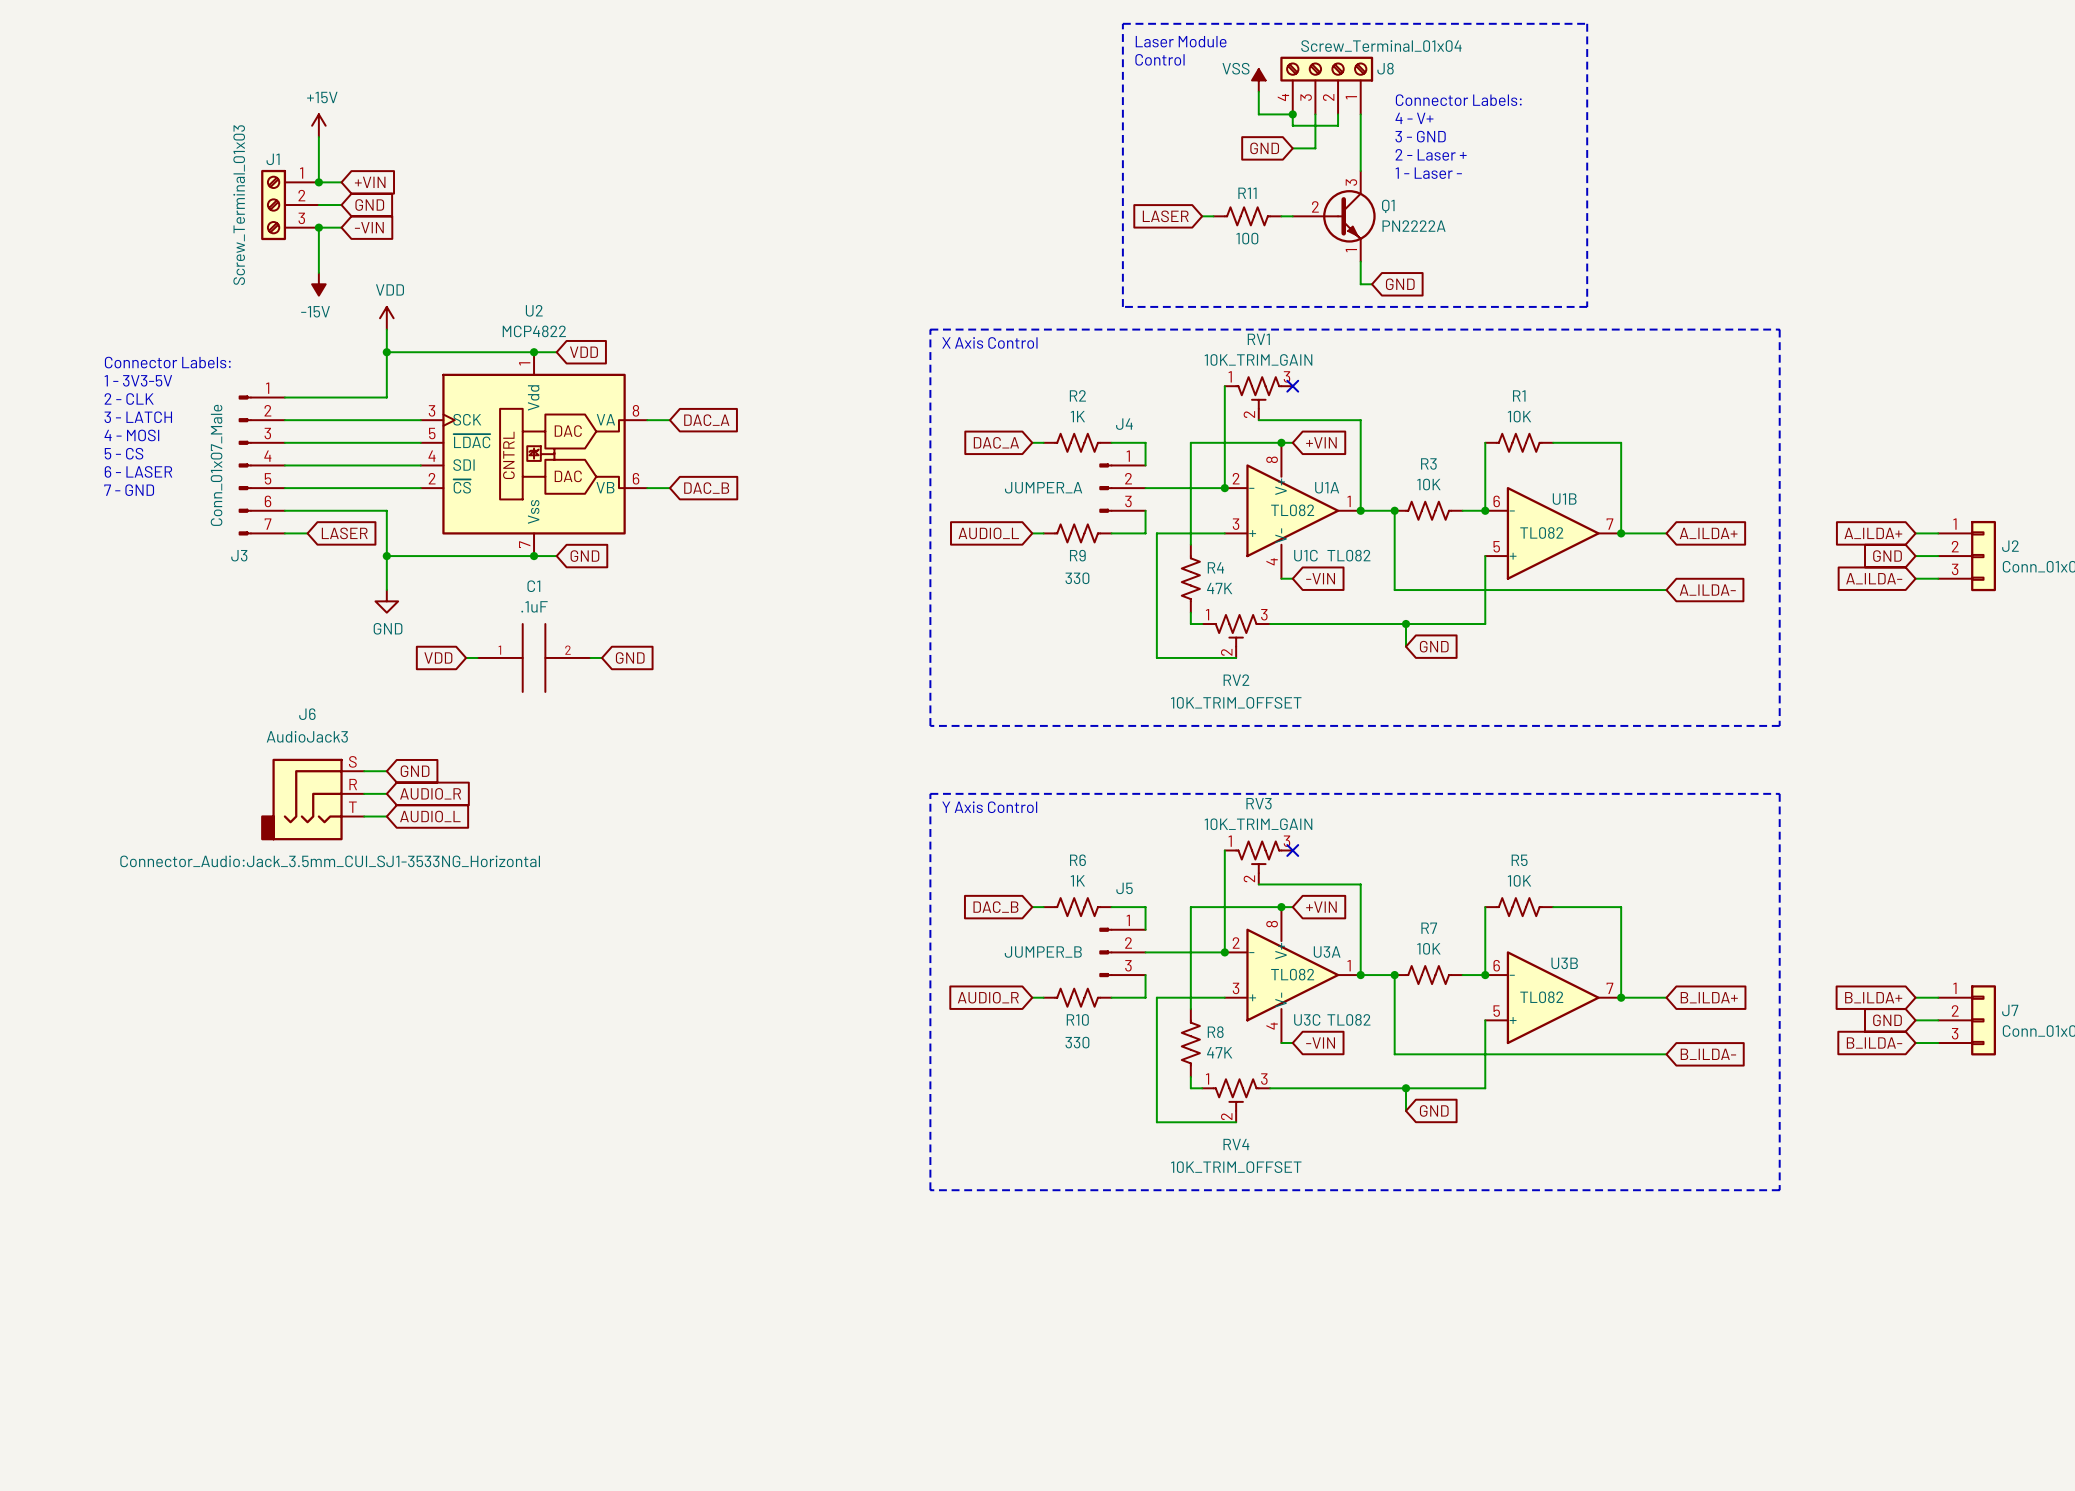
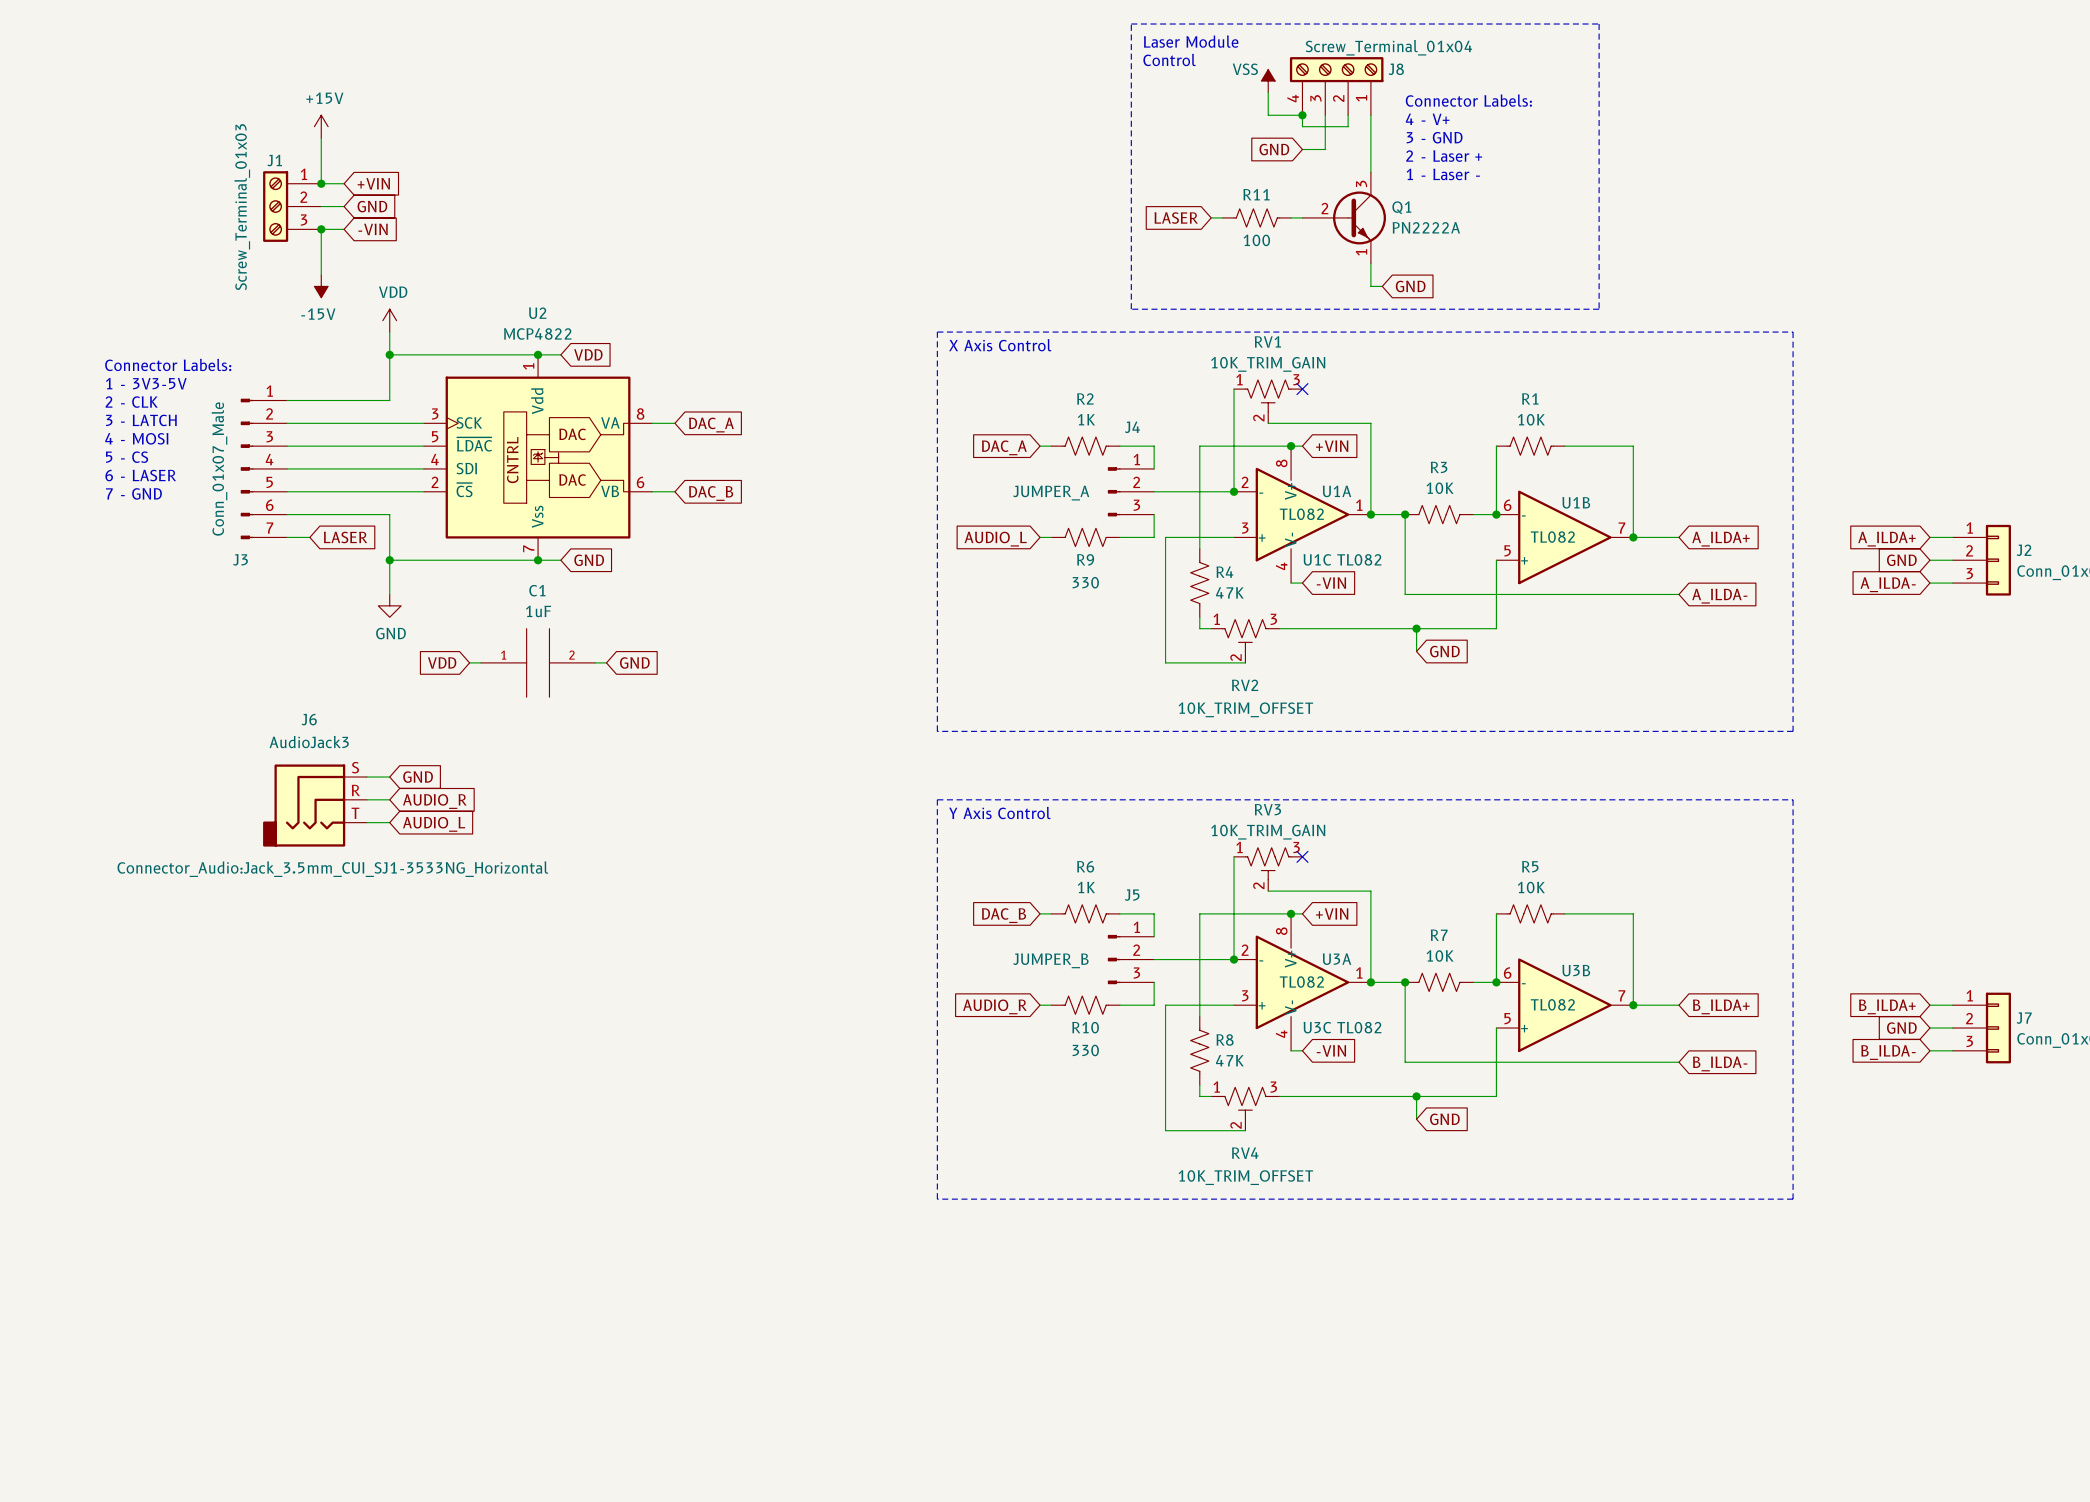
C1 value: .1uF (534, 606) -> 1uF (538, 611)

